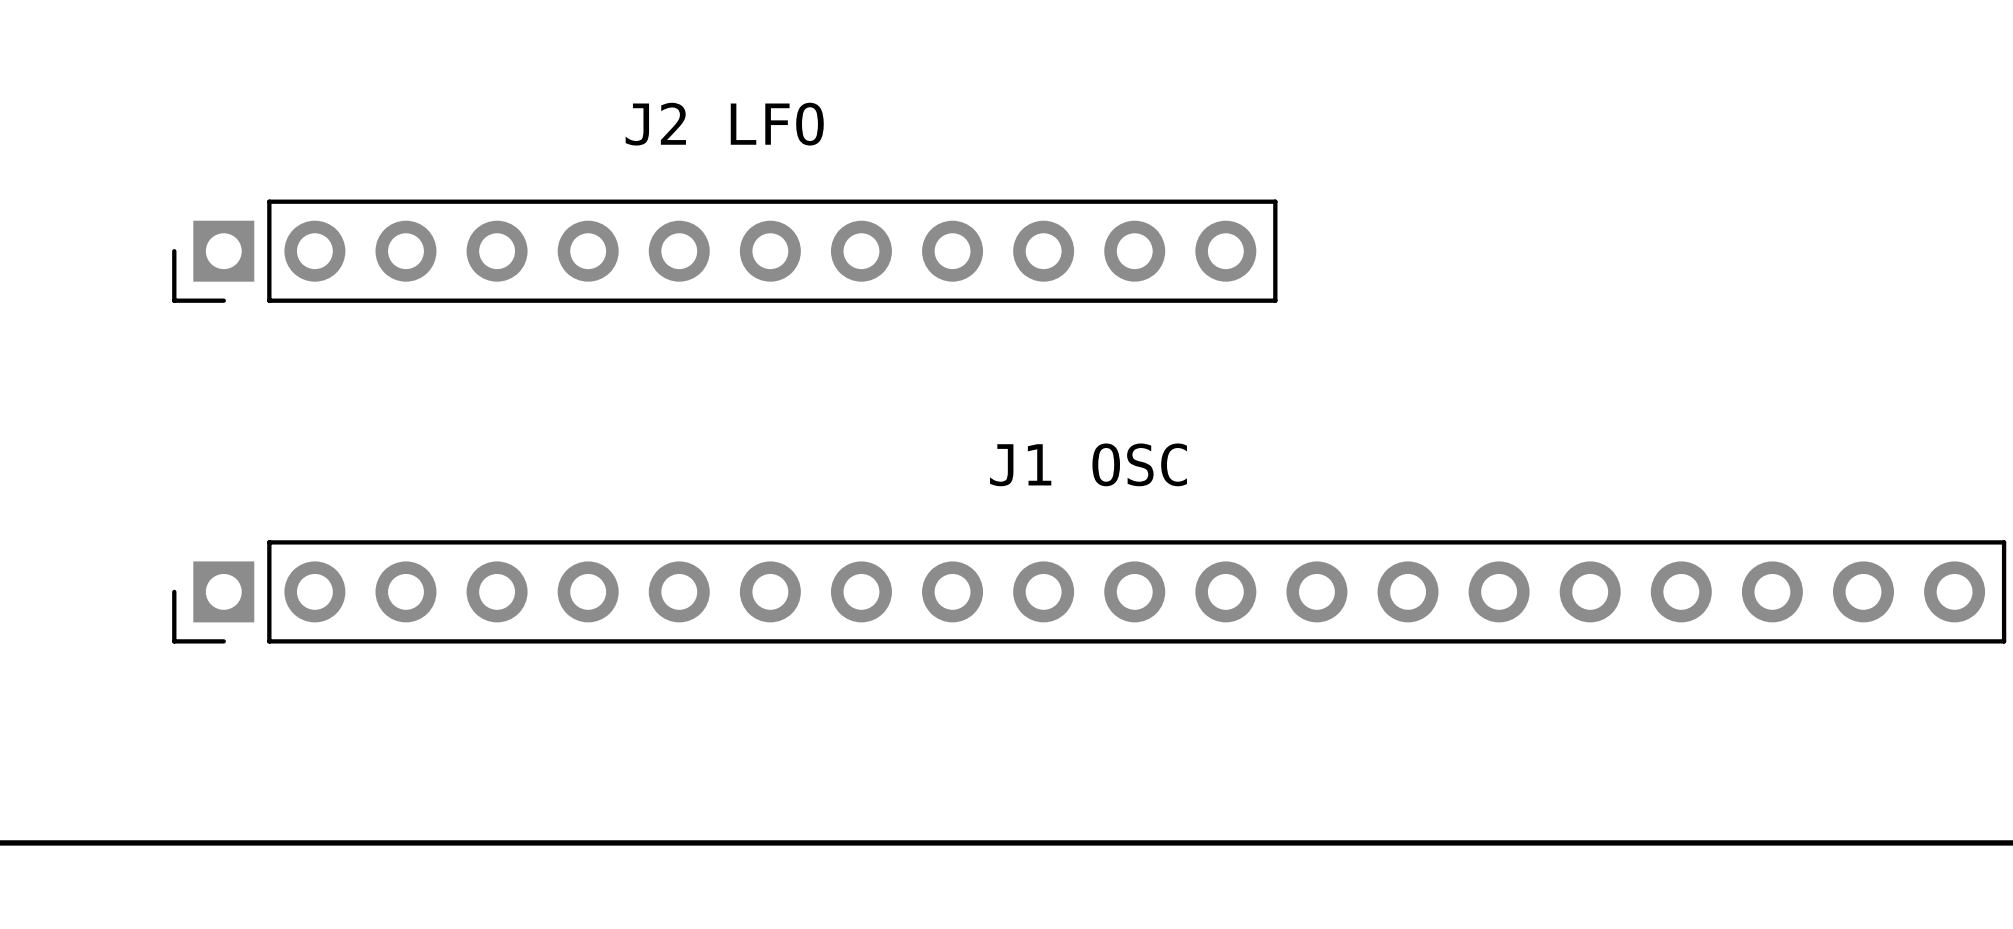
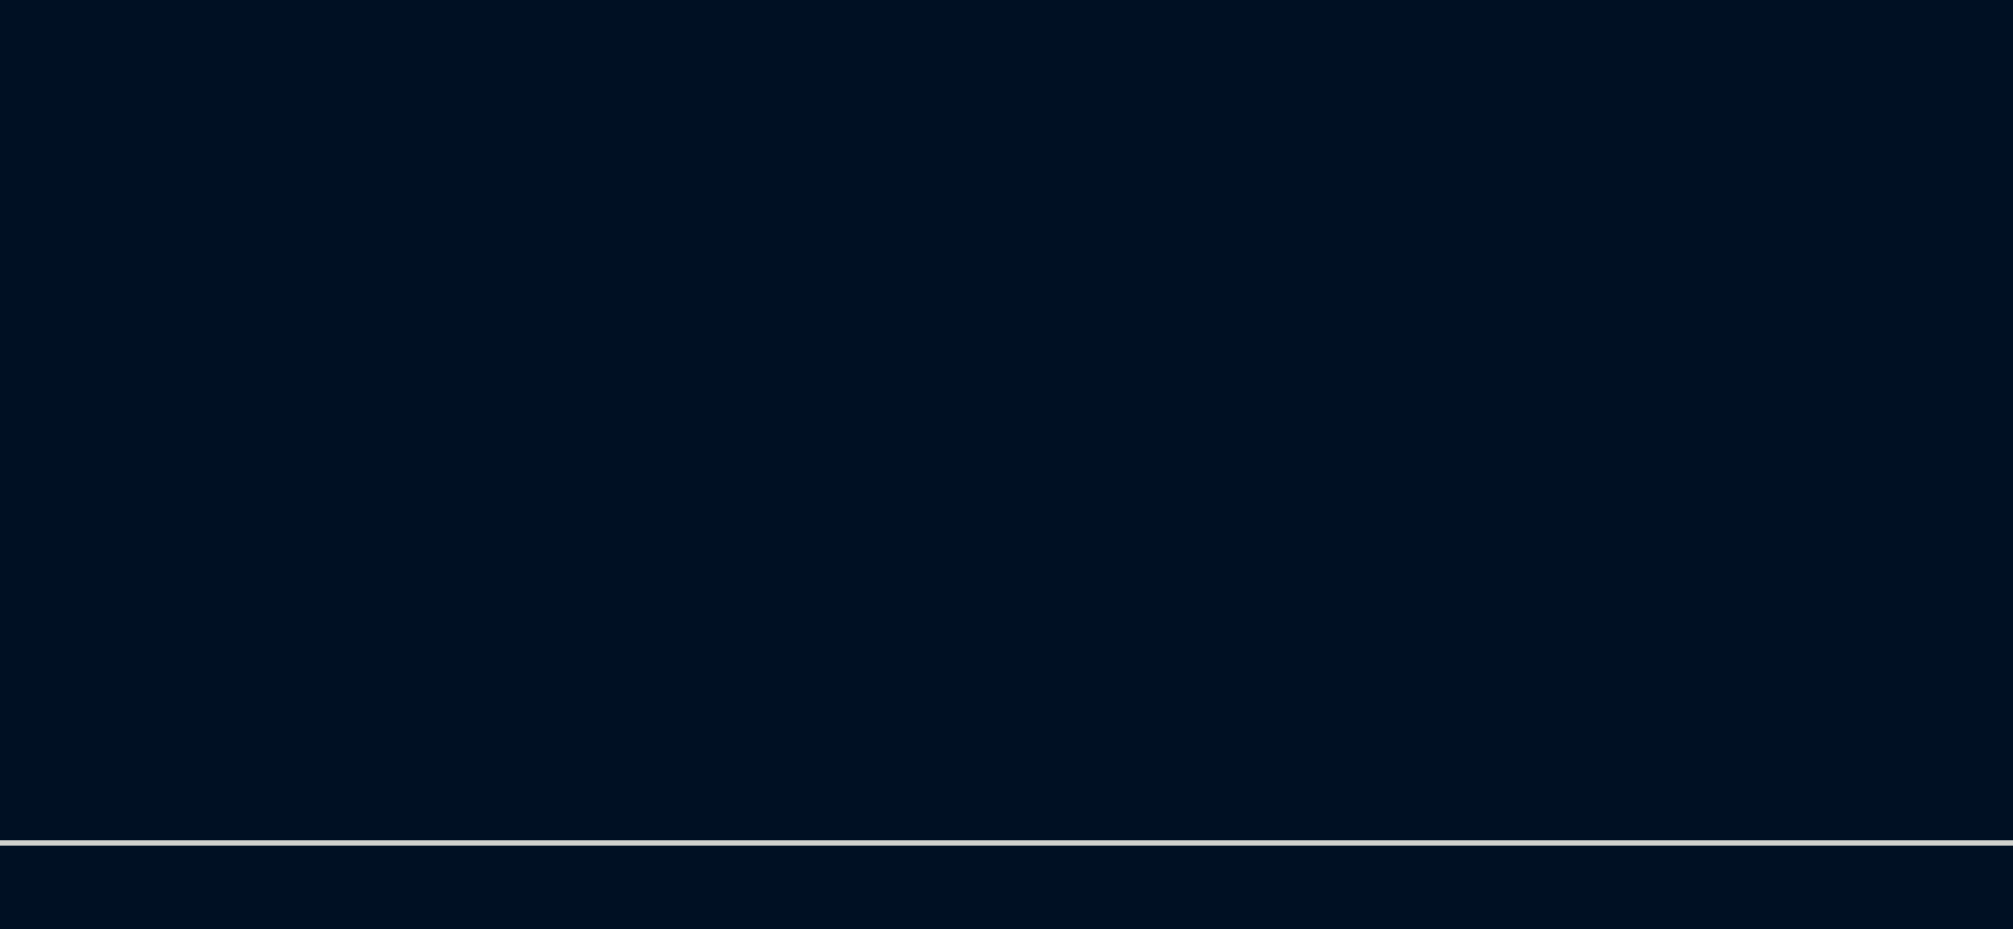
text: J2 LFO (724, 124) -> none
part: (724, 251) -> none
text: J1 OSC (1088, 464) -> none
part: (1089, 591) -> none

